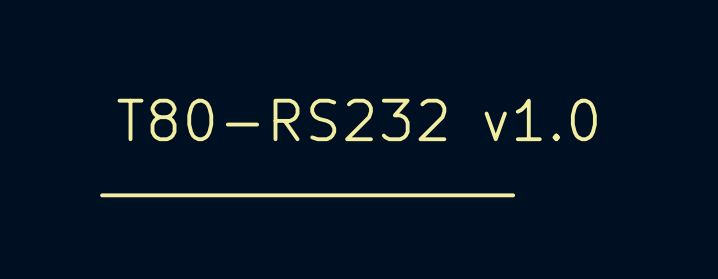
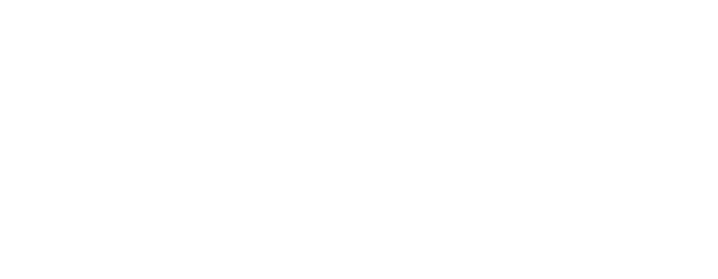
text: T80-RS232 v1.0 (357, 119) -> none
line: (102, 195) (513, 195) -> none

